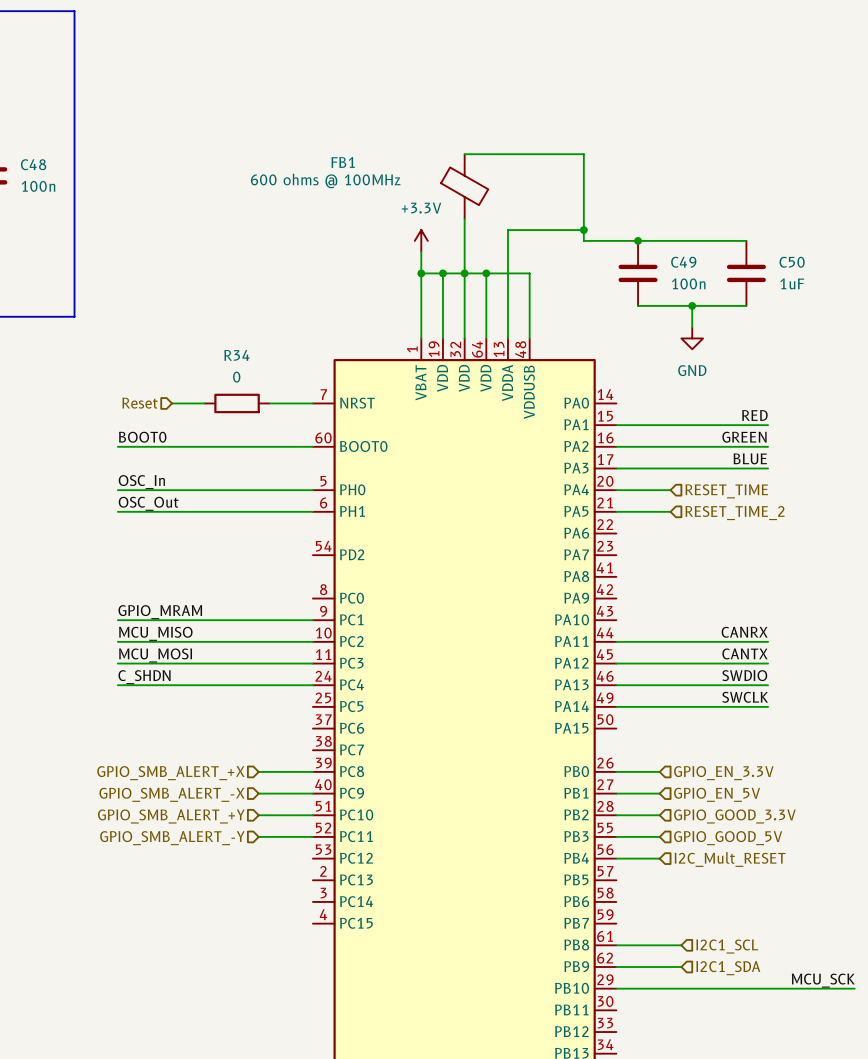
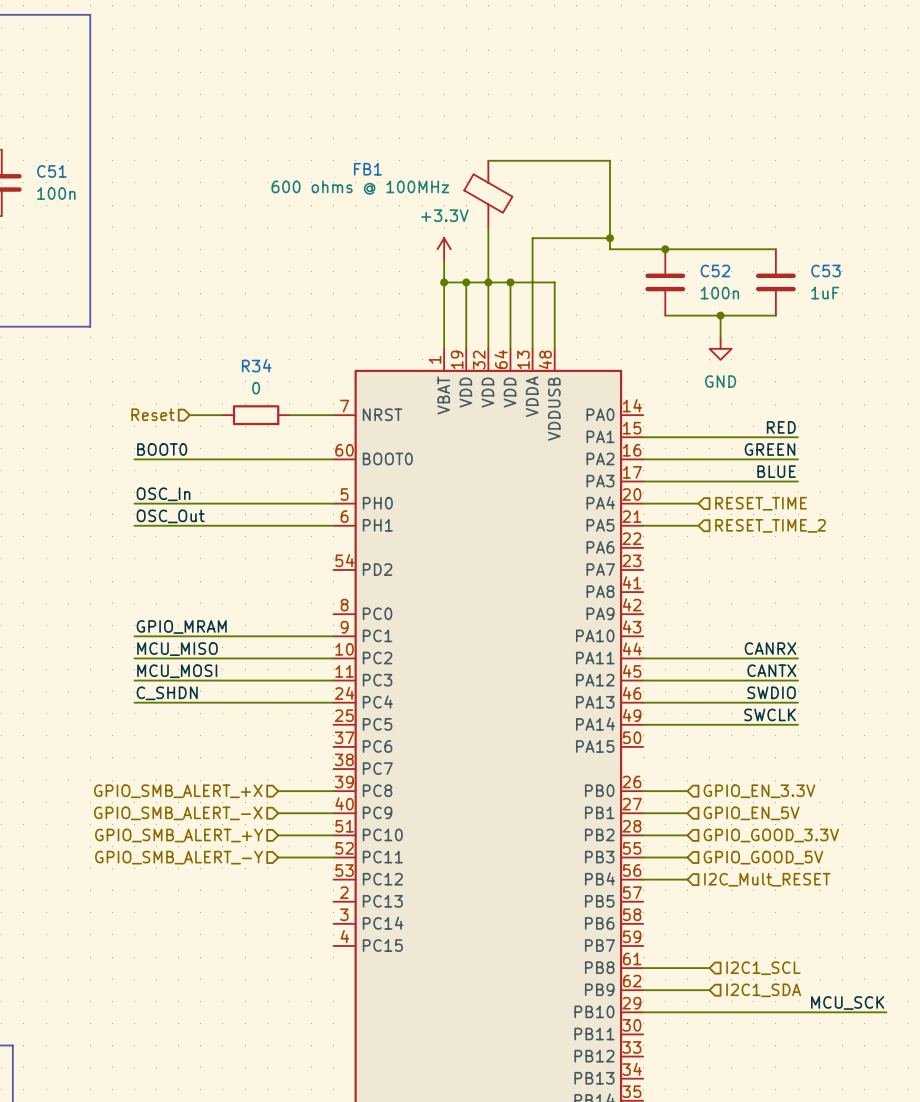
C48 name: C48 (33, 164) -> C51 (51, 171)
C49 name: C49 (683, 262) -> C52 (715, 270)
C50 name: C50 (792, 262) -> C53 (826, 270)

